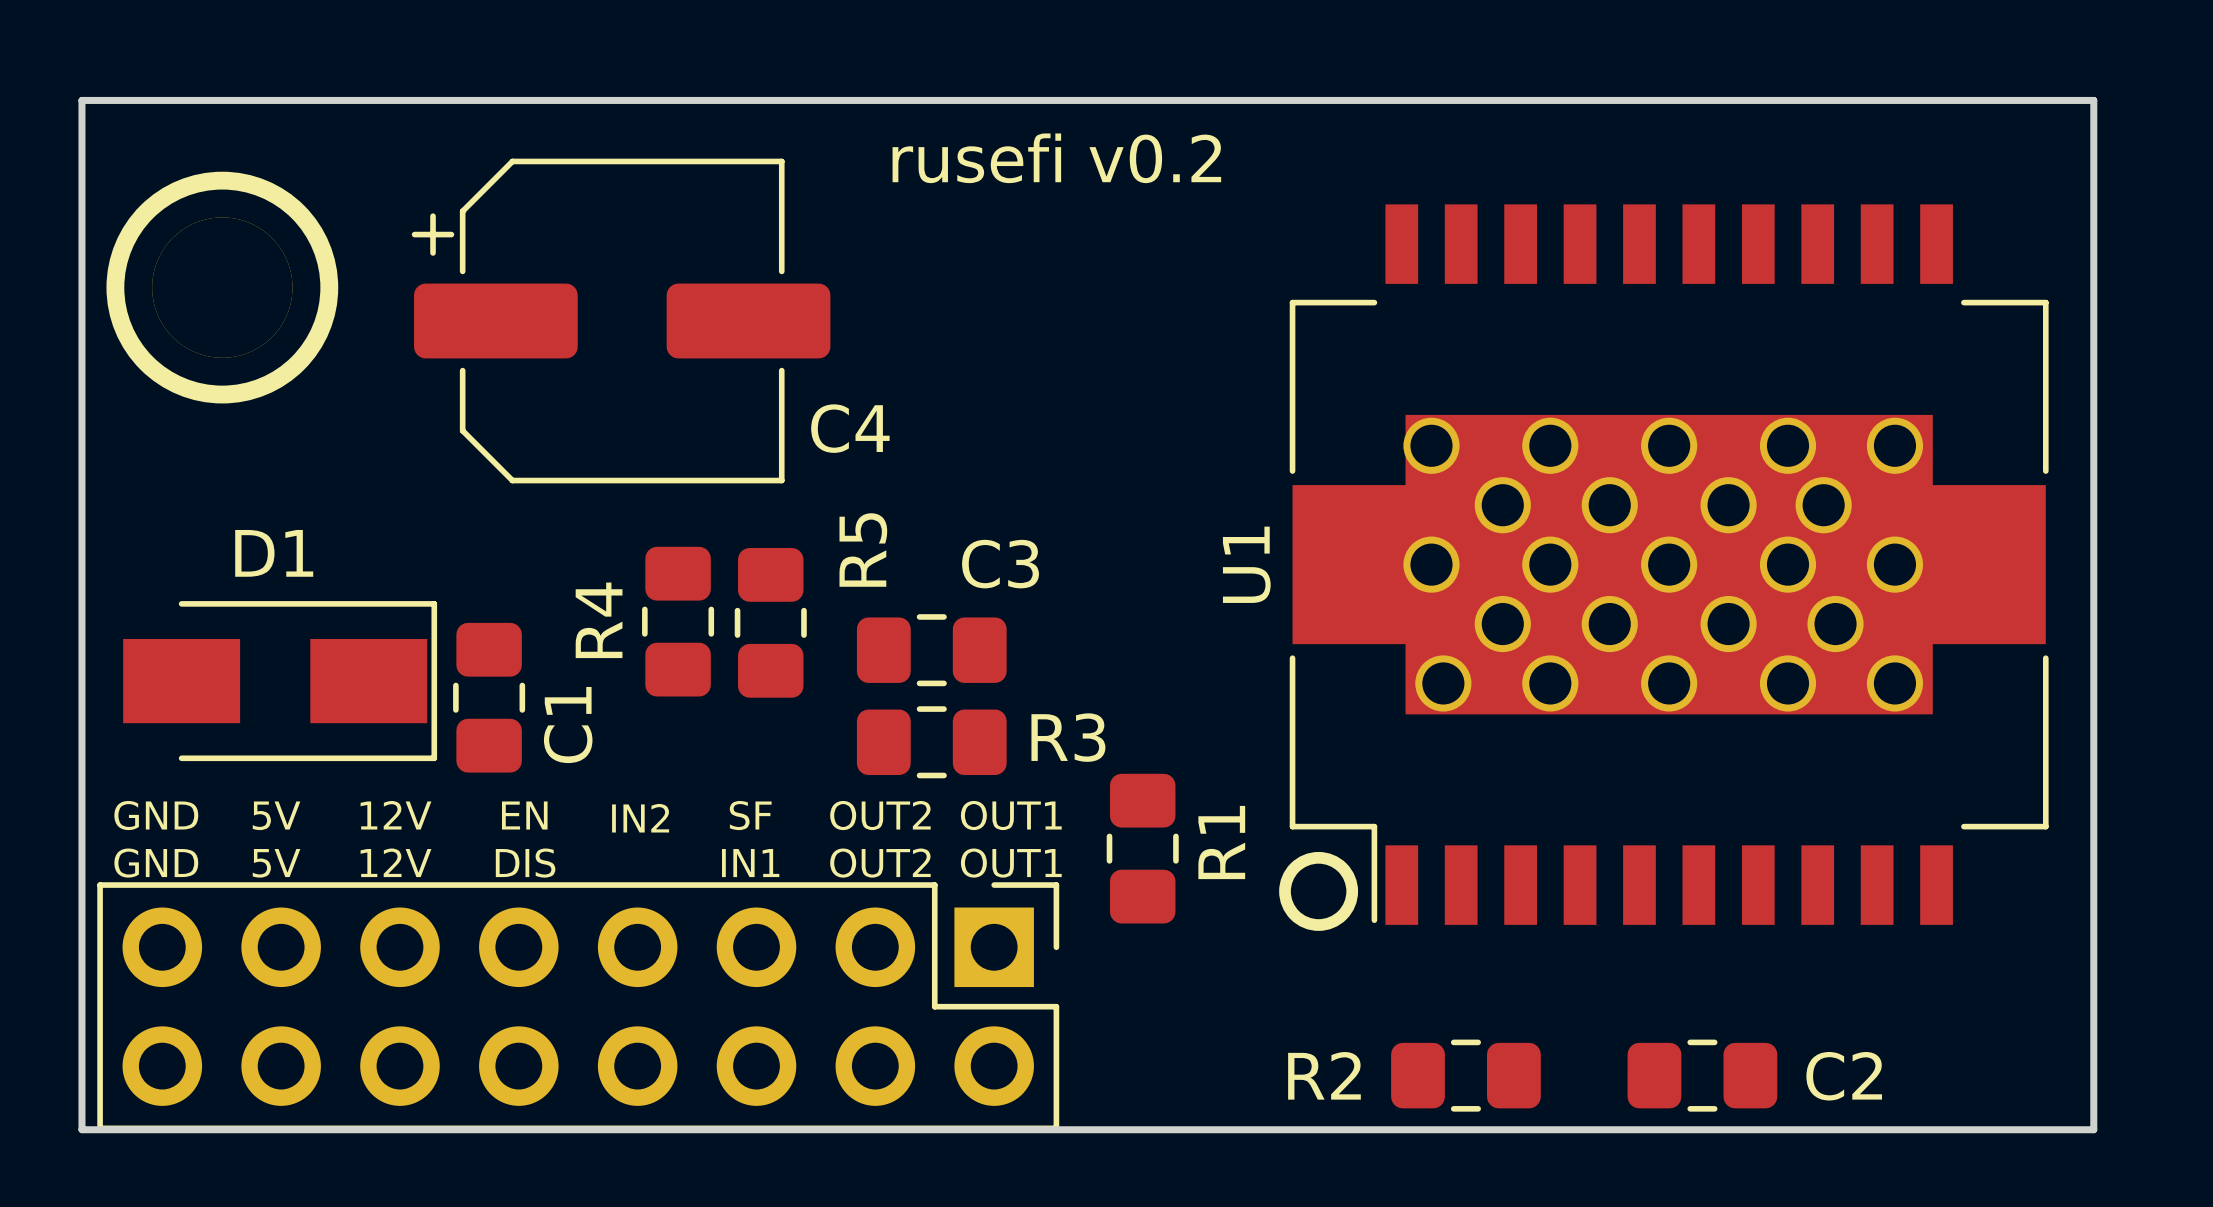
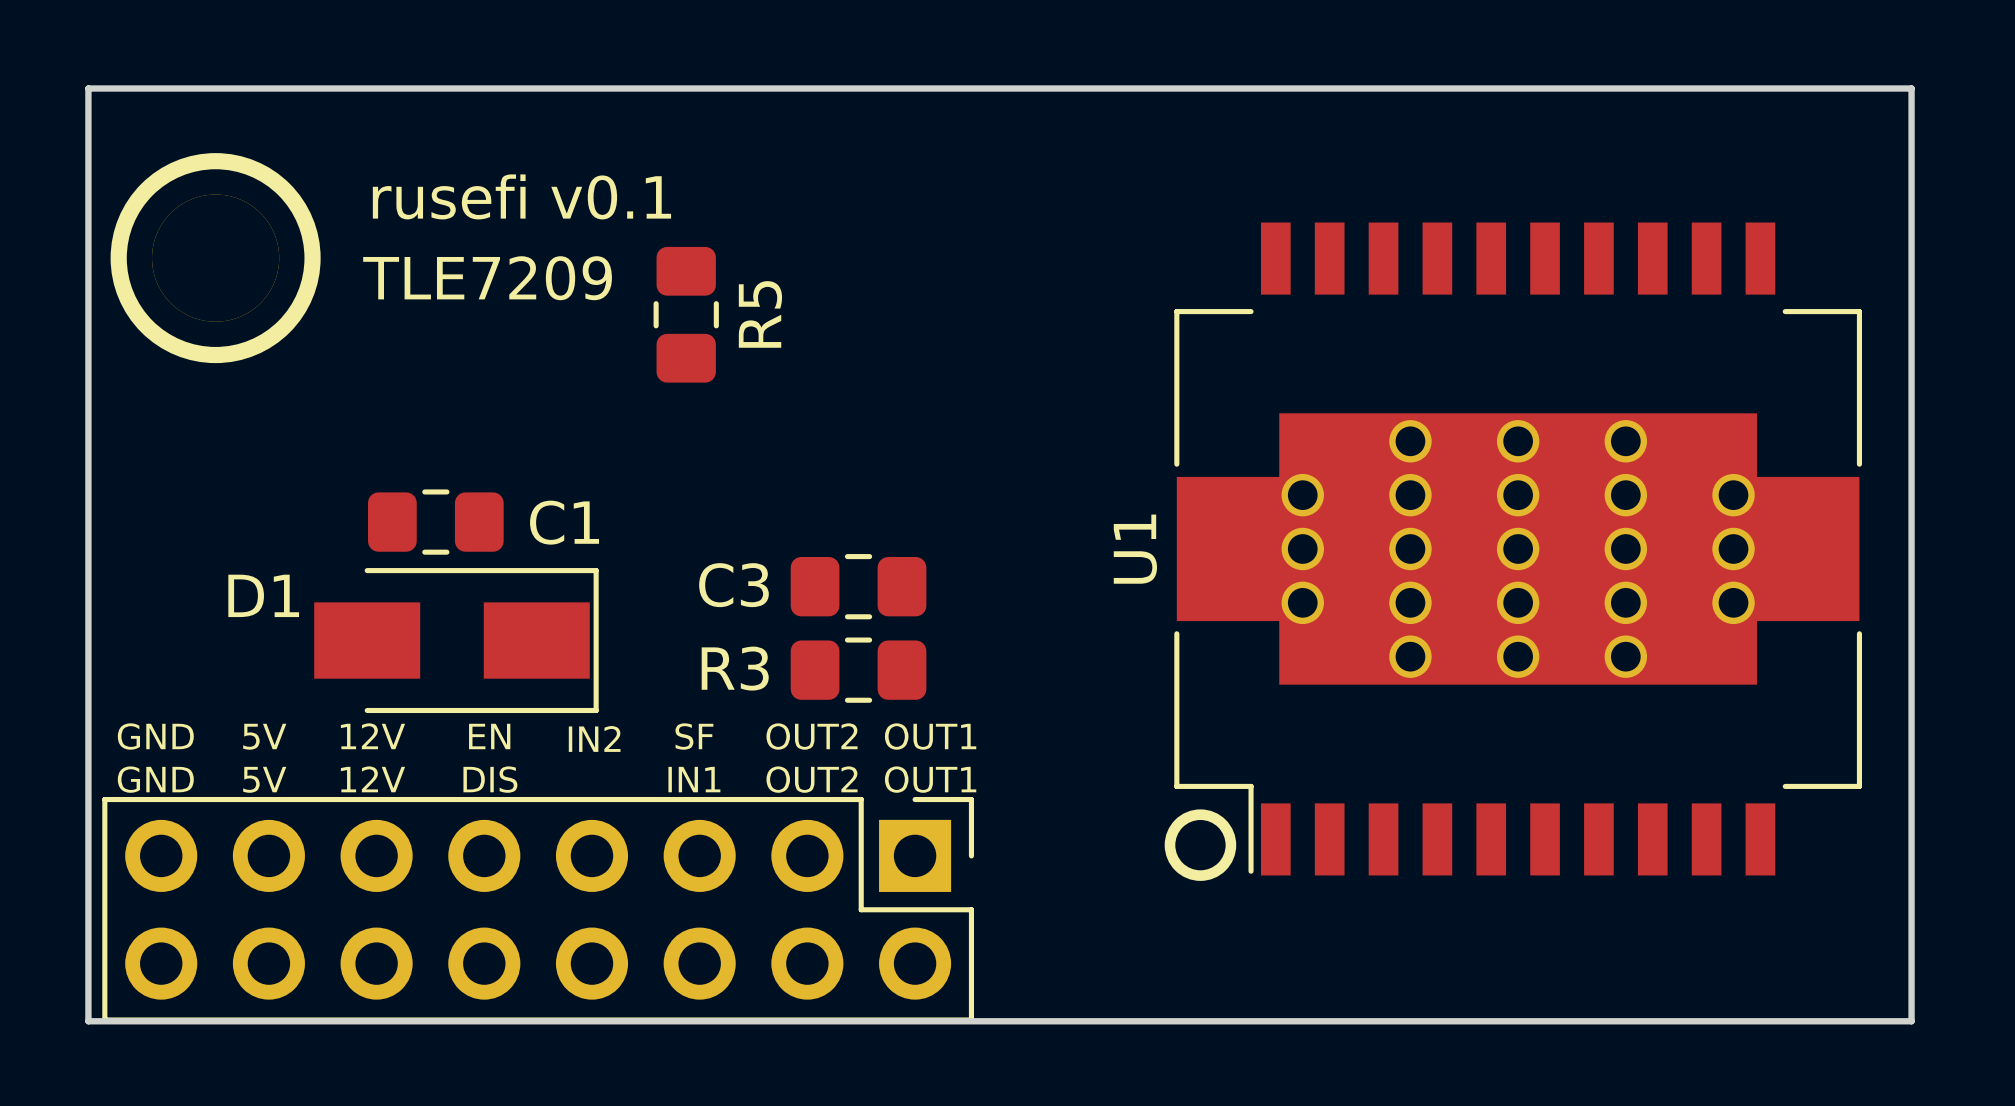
text: rusefi v0.2 (1056, 158) -> none
U1 footprint: [1289, 204, 2049, 925] -> [1174, 222, 1863, 876]
text: none -> rusefi v0.1 (521, 196)
text: none -> TLE7209 (487, 278)
C4: (621, 321) -> none
R5 name position: R5 (863, 550) -> R5 (760, 314)
D1 name position: D1 (274, 553) -> D1 (263, 595)
C3 name position: C3 (1000, 564) -> C3 (733, 585)
R4: (678, 621) -> none
R5 position: (770, 622) -> (686, 314)
D1 position: (280, 681) -> (456, 640)
C1 rotation: 0° (489, 697) -> 90° clockwise (435, 522)
C1 position: (489, 697) -> (435, 522)
R3 name position: R3 (1068, 737) -> R3 (735, 668)
R1: (1142, 848) -> none
drawing position: (1318, 891) -> (1200, 845)
R2: (1465, 1075) -> none
C2: (1702, 1075) -> none

